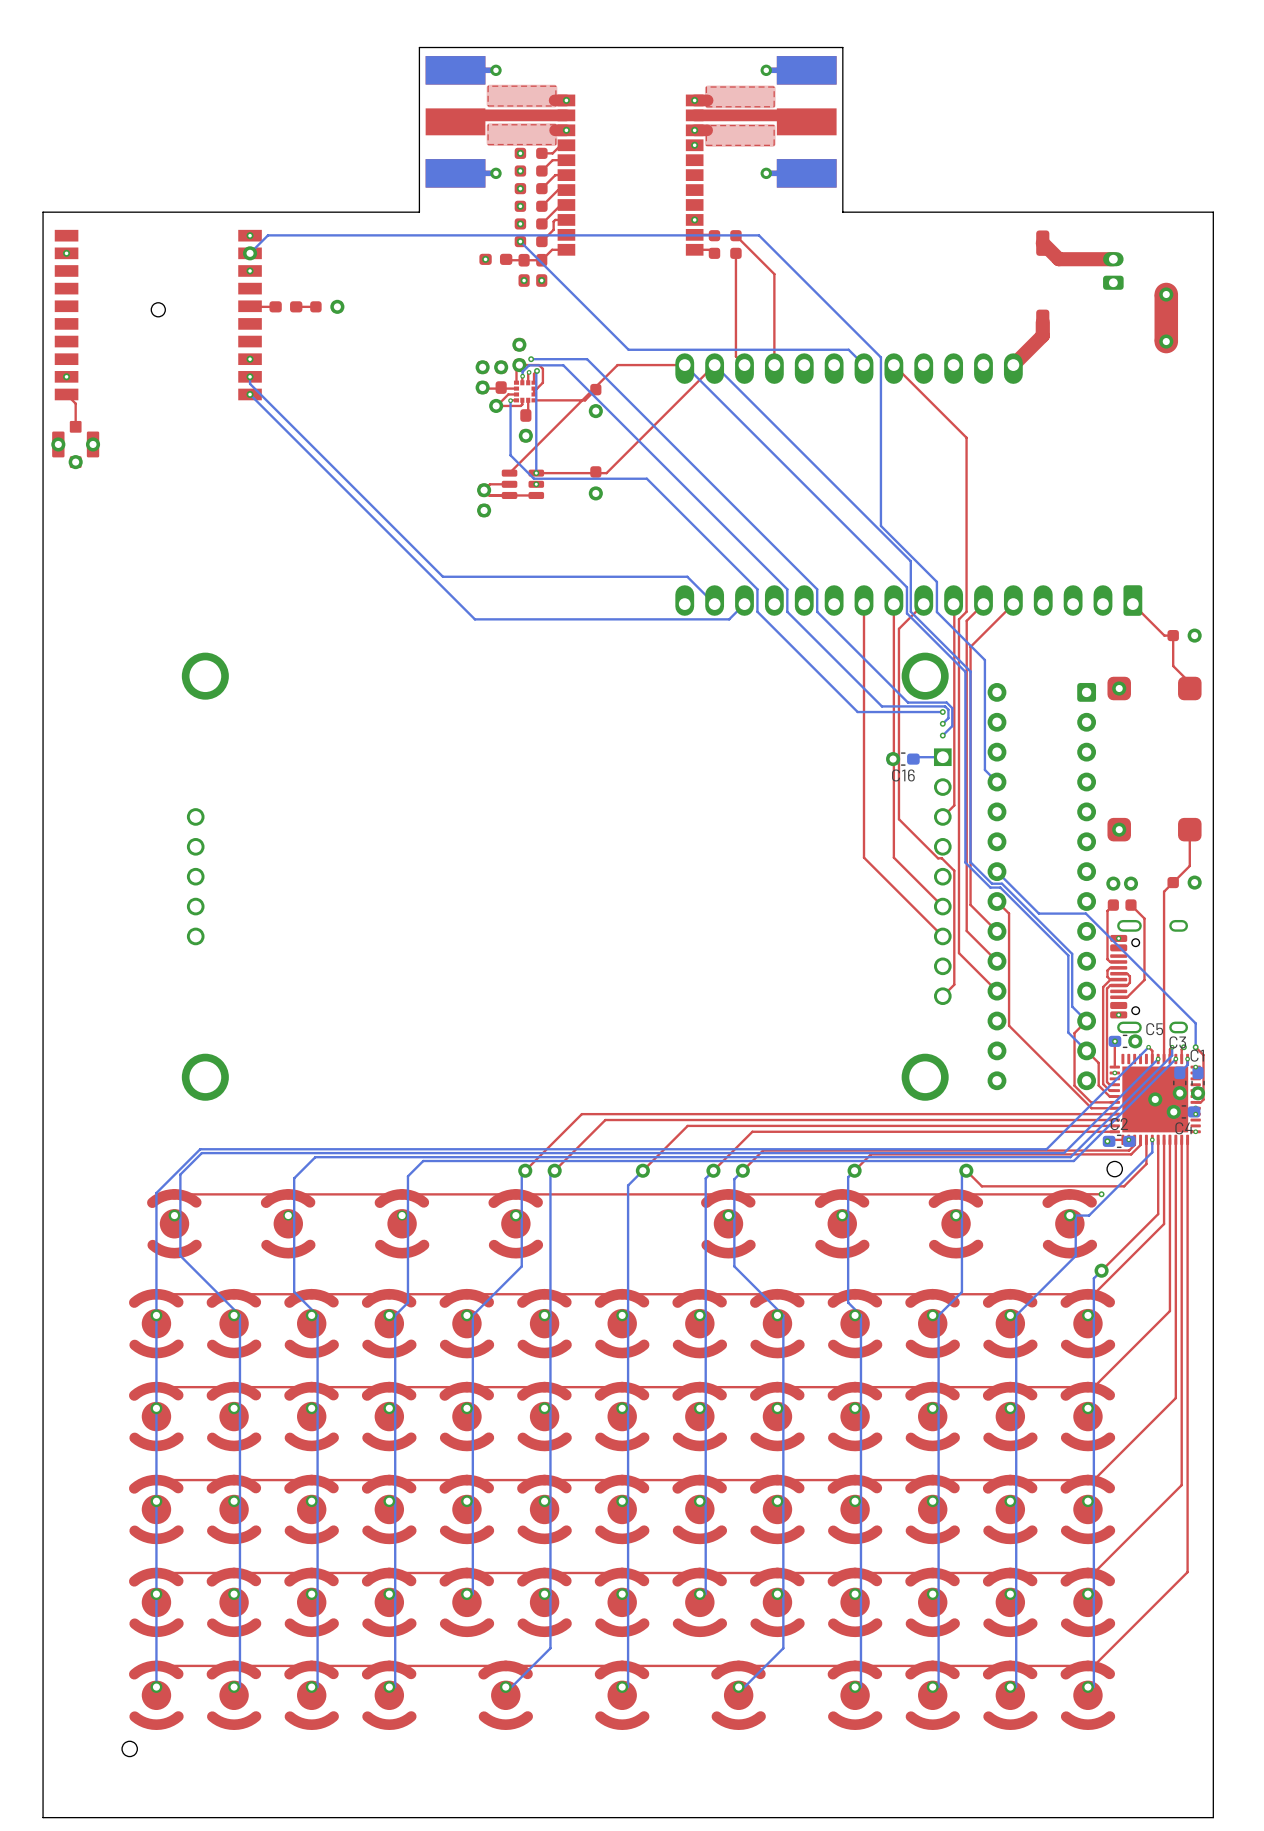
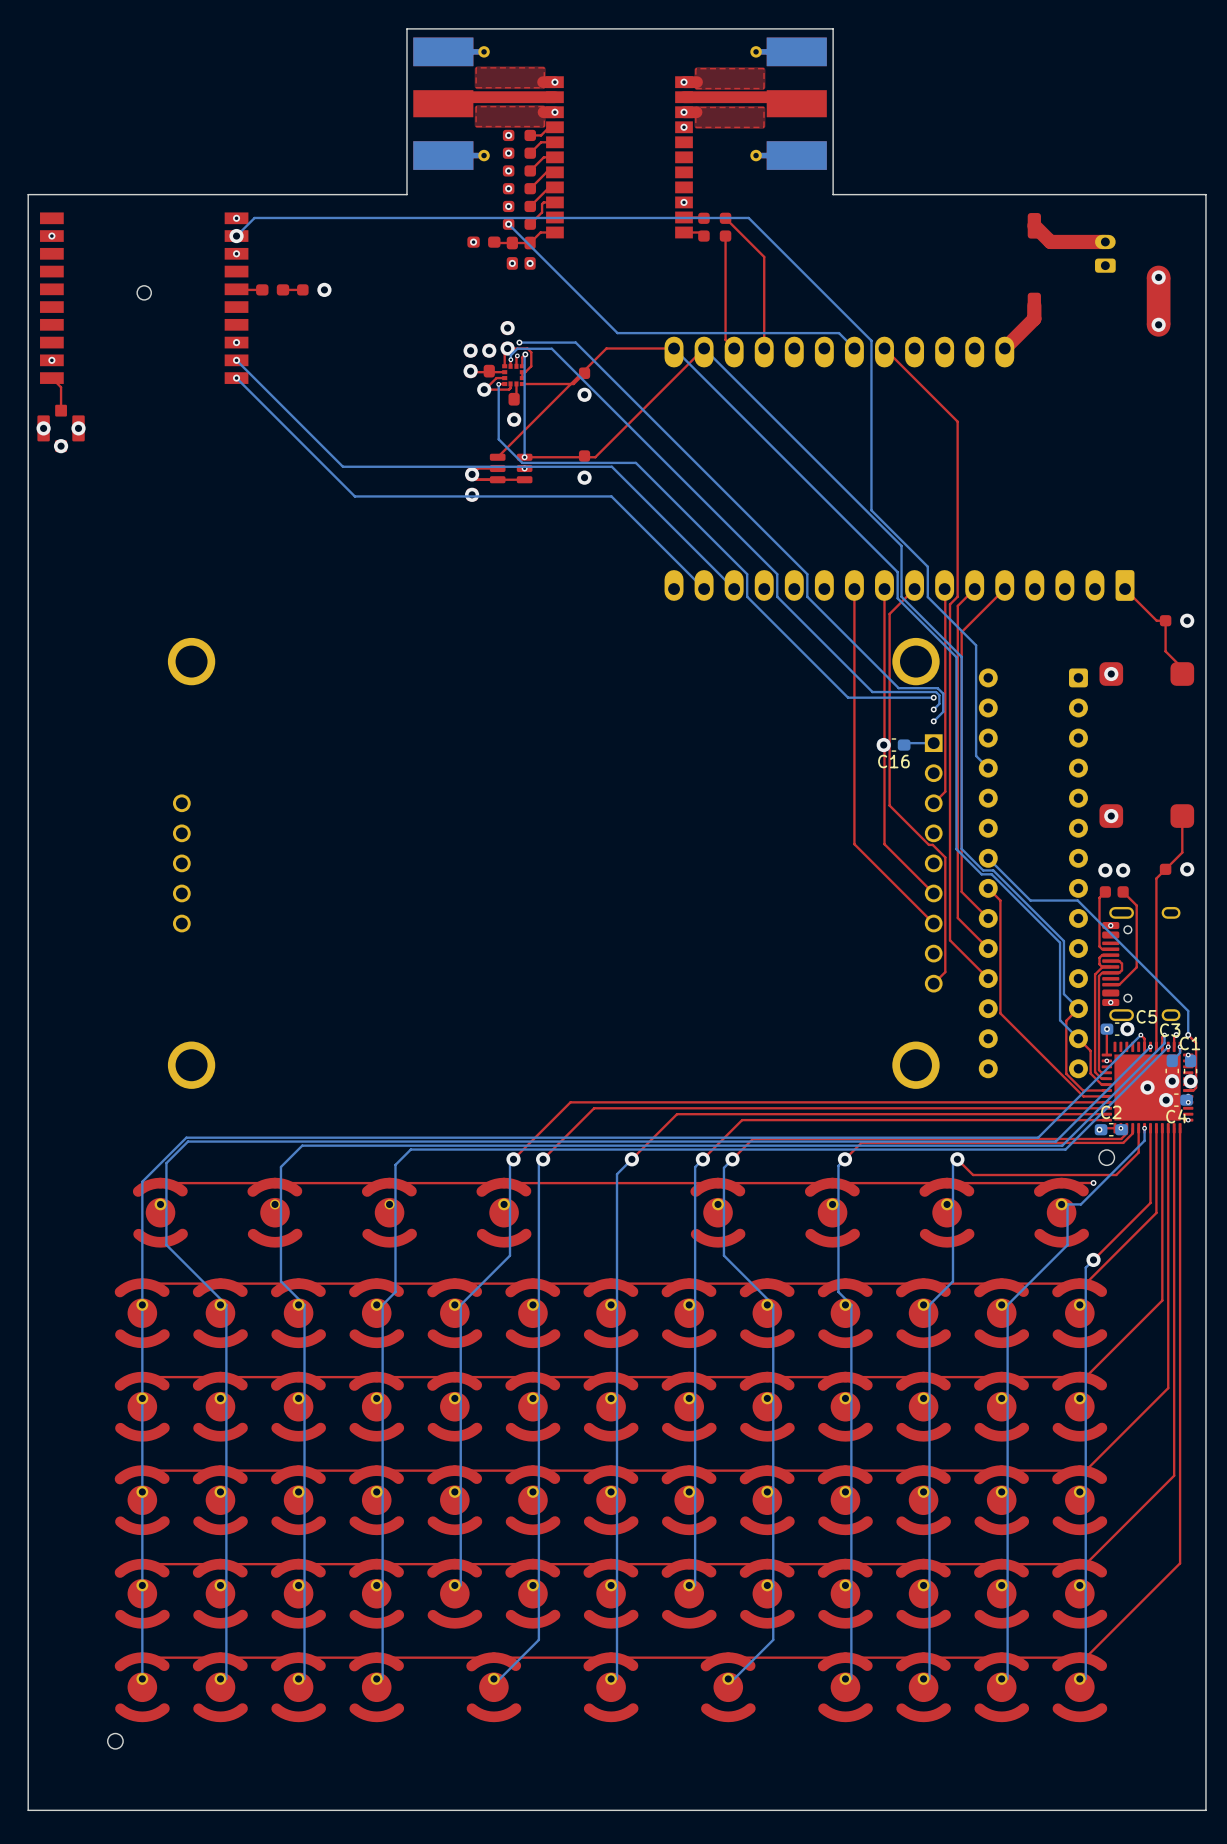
bottom track: (250, 376) (250, 383) (442, 576) (687, 576) -> (236, 360) (342, 466) (611, 466) (734, 589)
bottom track: (367, 512) (474, 619) (729, 619) (744, 604) -> (354, 496) (611, 496) (676, 561)

